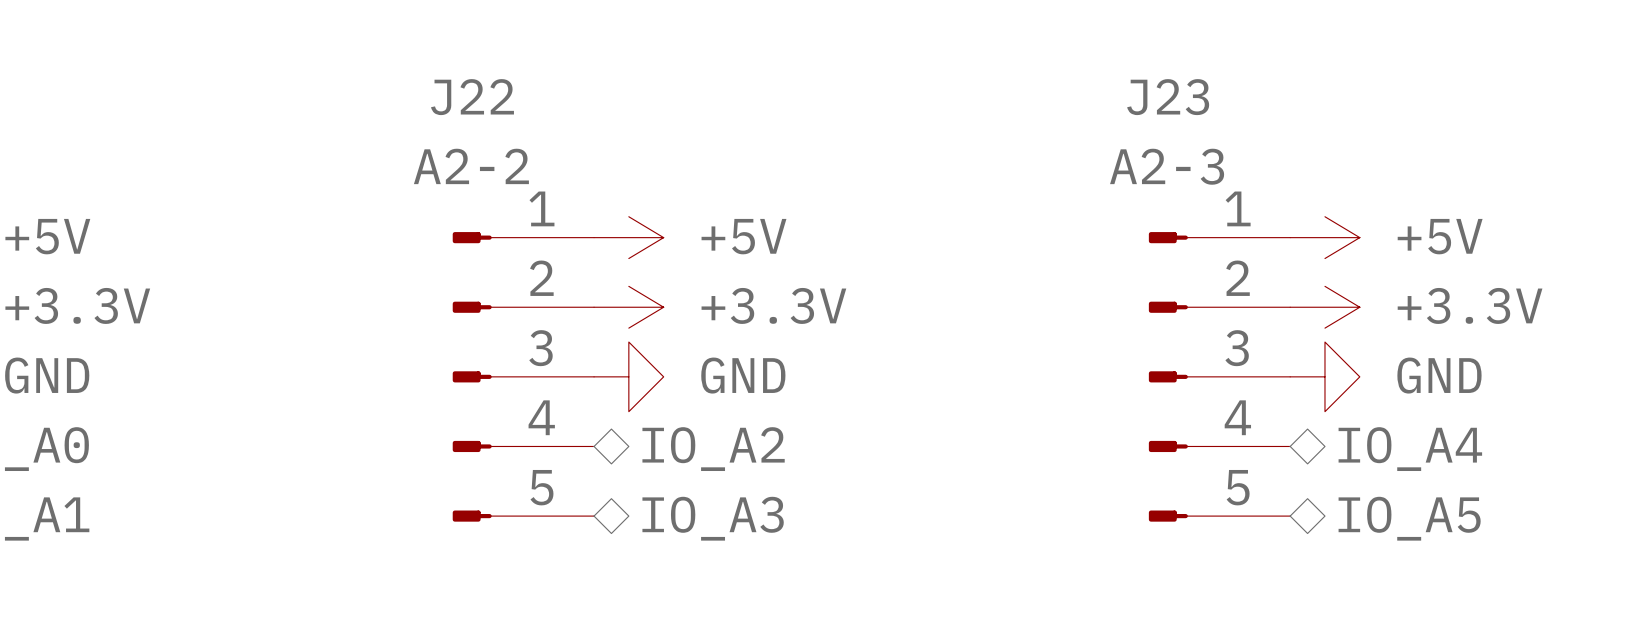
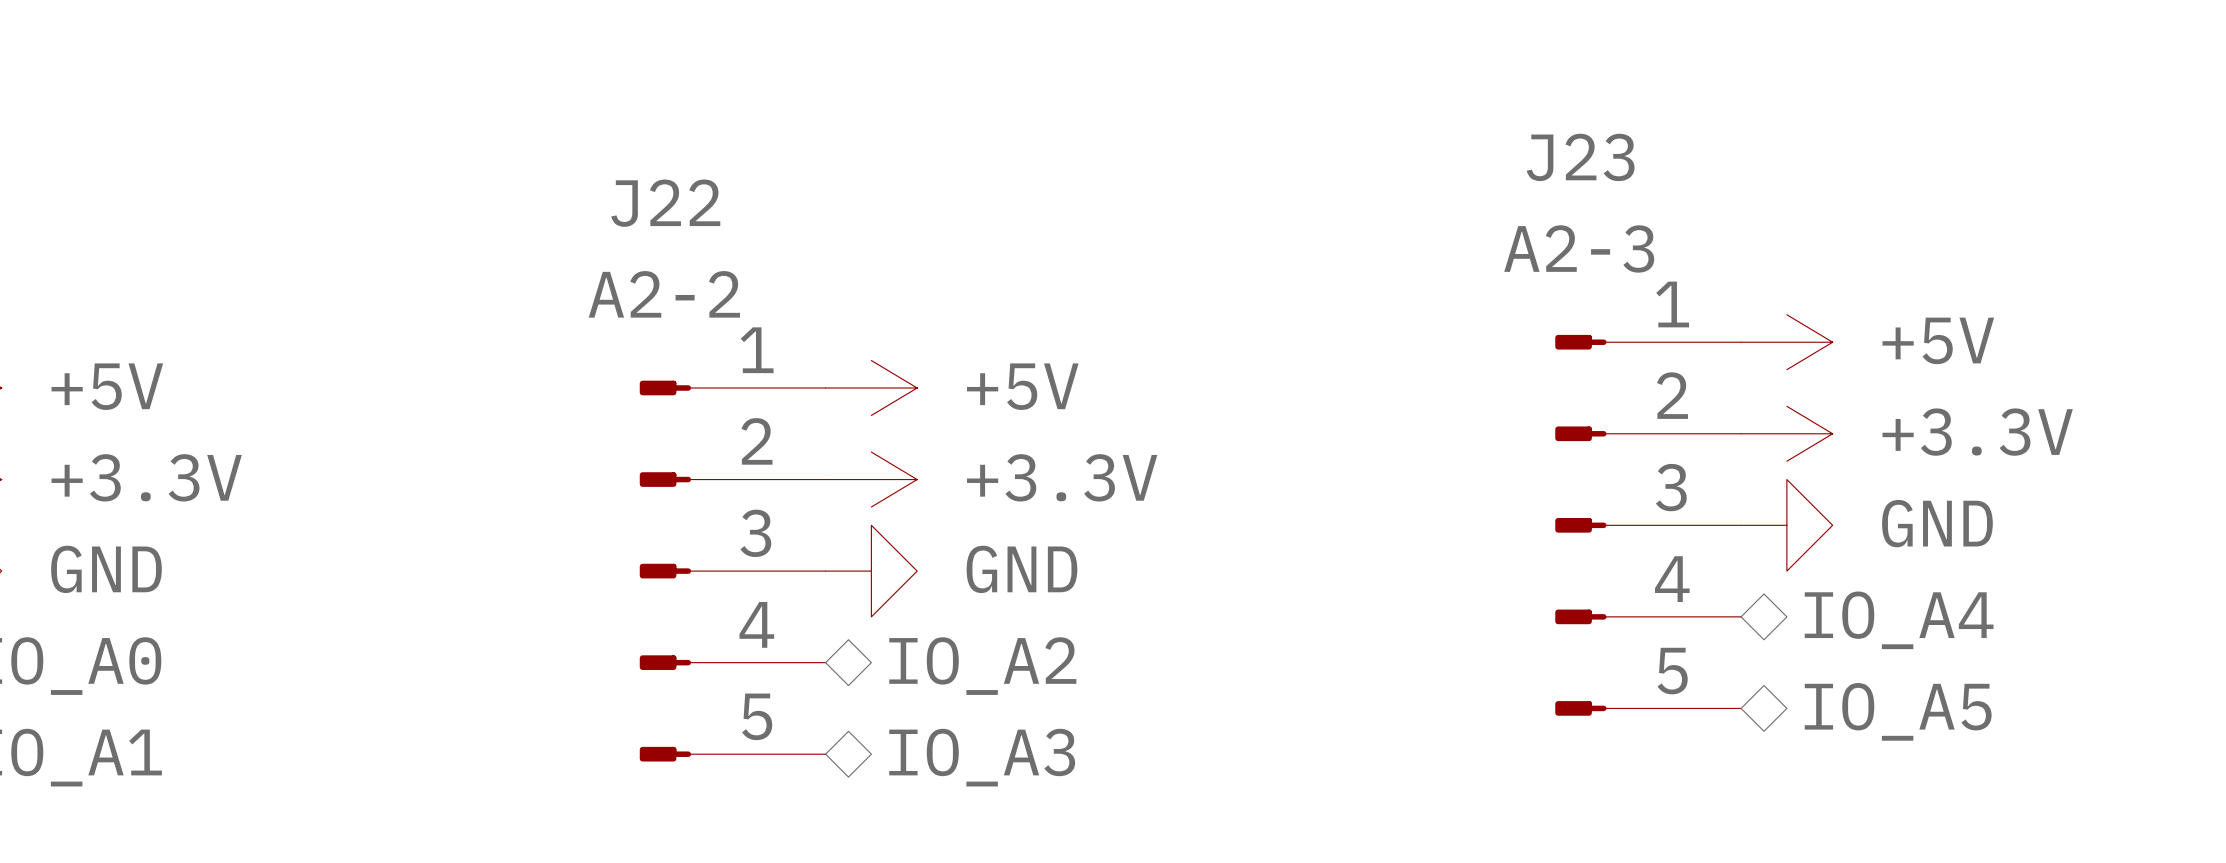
power symbol position: +5V (1324, 237) -> +5V (1786, 342)
power symbol position: +3.3V (1324, 307) -> +3.3V (1786, 433)
J23 position: (1219, 376) -> (1648, 525)
power symbol position: GND (1324, 376) -> GND (1786, 525)
hierarchical label position: IO_A4 (1410, 449) -> IO_A4 (1899, 620)
hierarchical label position: IO_A5 (1409, 518) -> IO_A5 (1898, 711)

